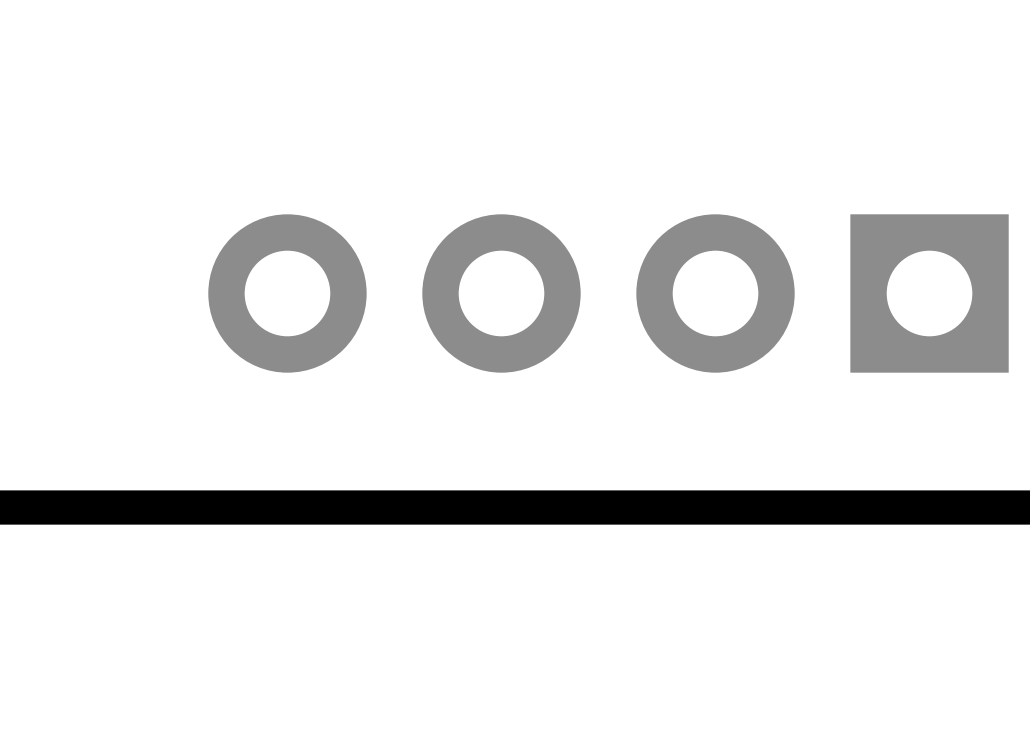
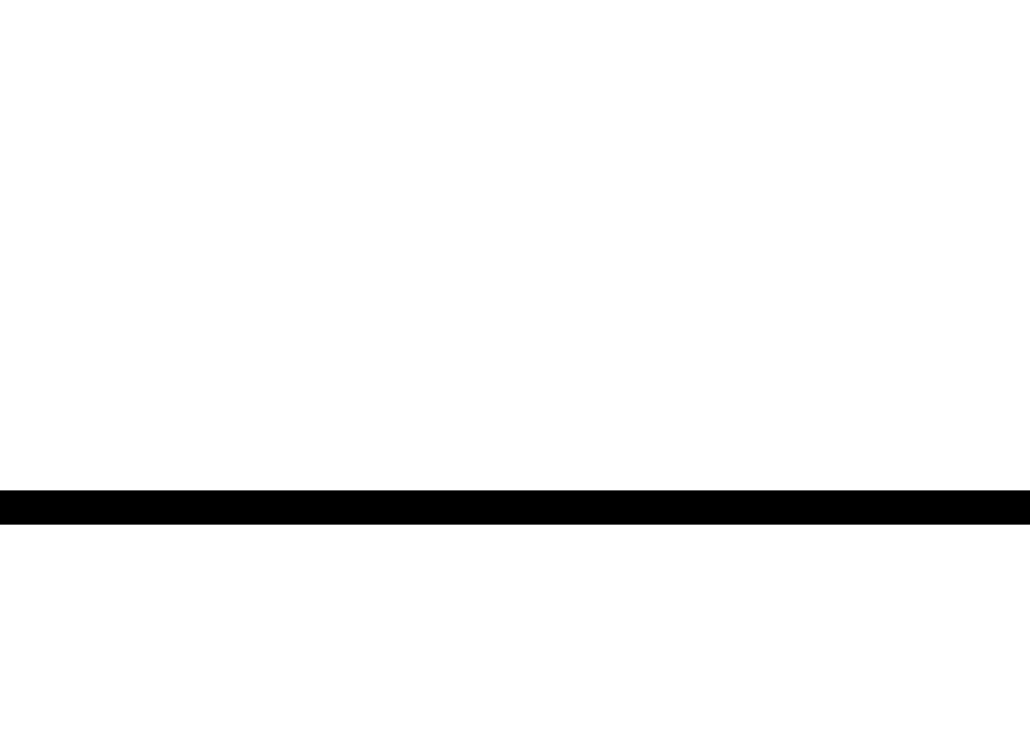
part: (608, 293) -> none

